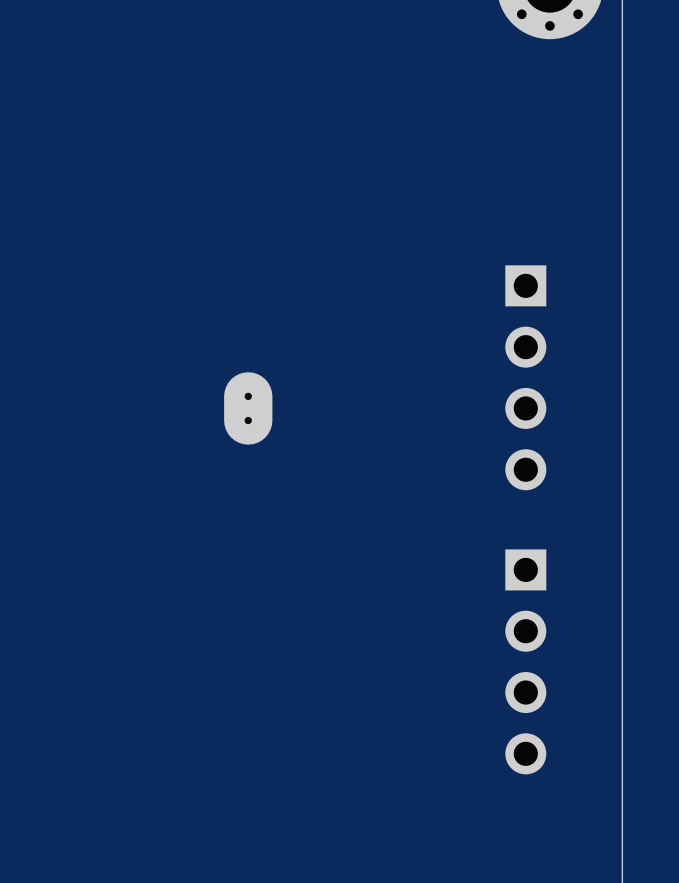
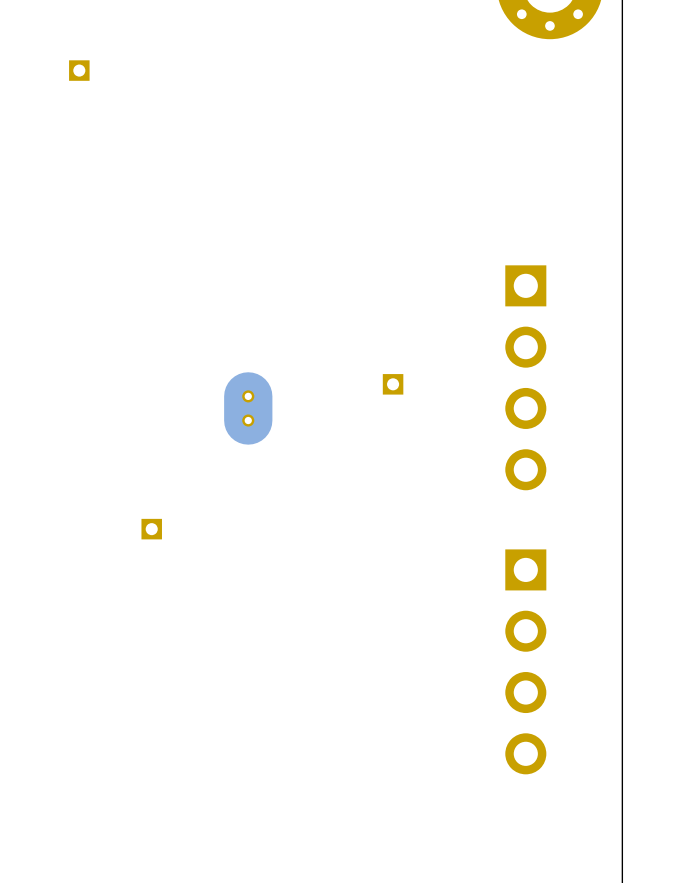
part: none -> (79, 70)
part: none -> (393, 384)
part: none -> (151, 529)

